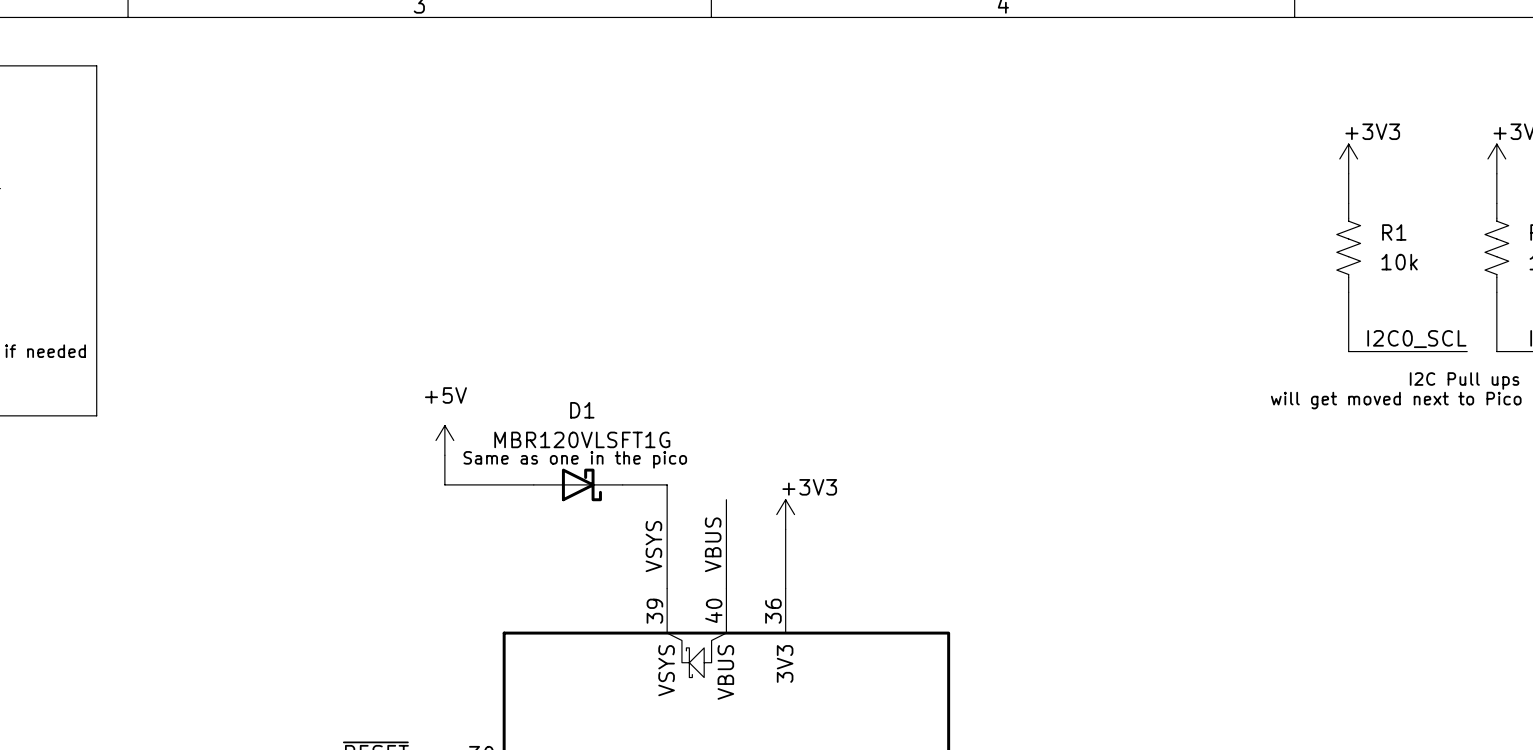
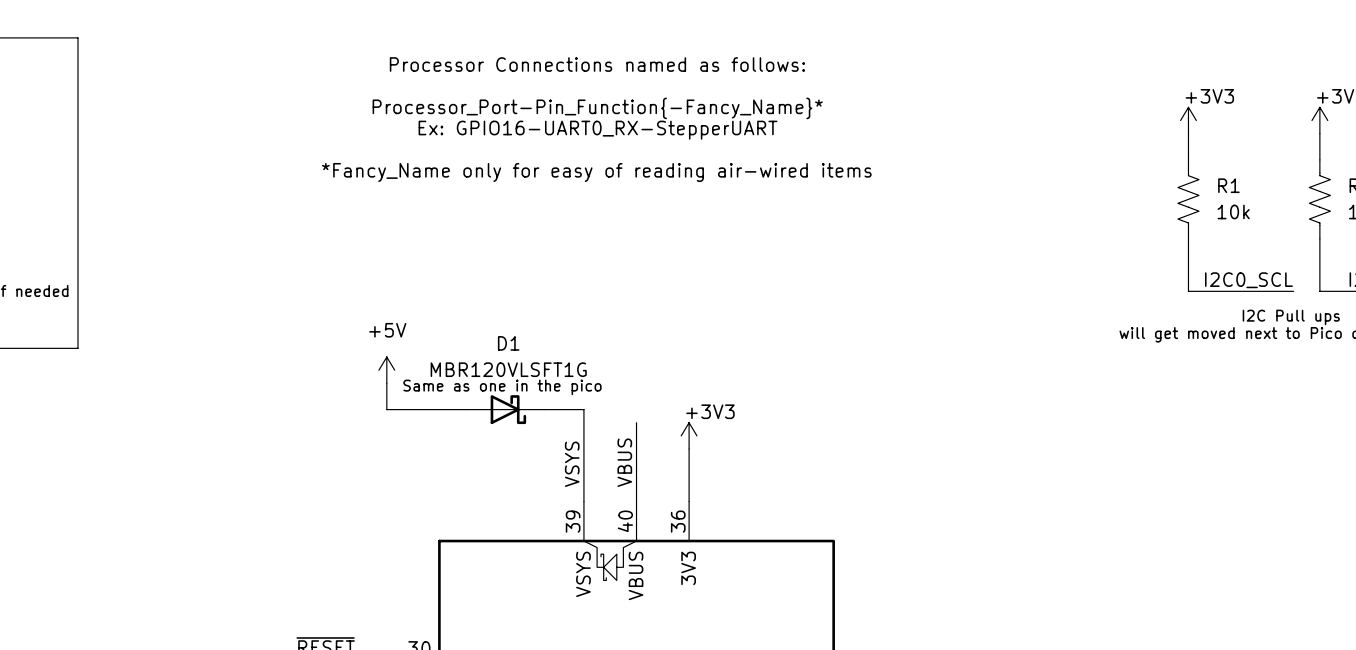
text: none -> Processor Connections named as follows: (597, 64)
text: none -> Processor_Port-Pin_Function{-Fancy_Name}* (597, 108)
text: none -> Ex: GPIO16-UART0_RX-StepperUART (598, 130)
text: none -> *Fancy_Name only for easy of reading air-wired items (596, 172)

